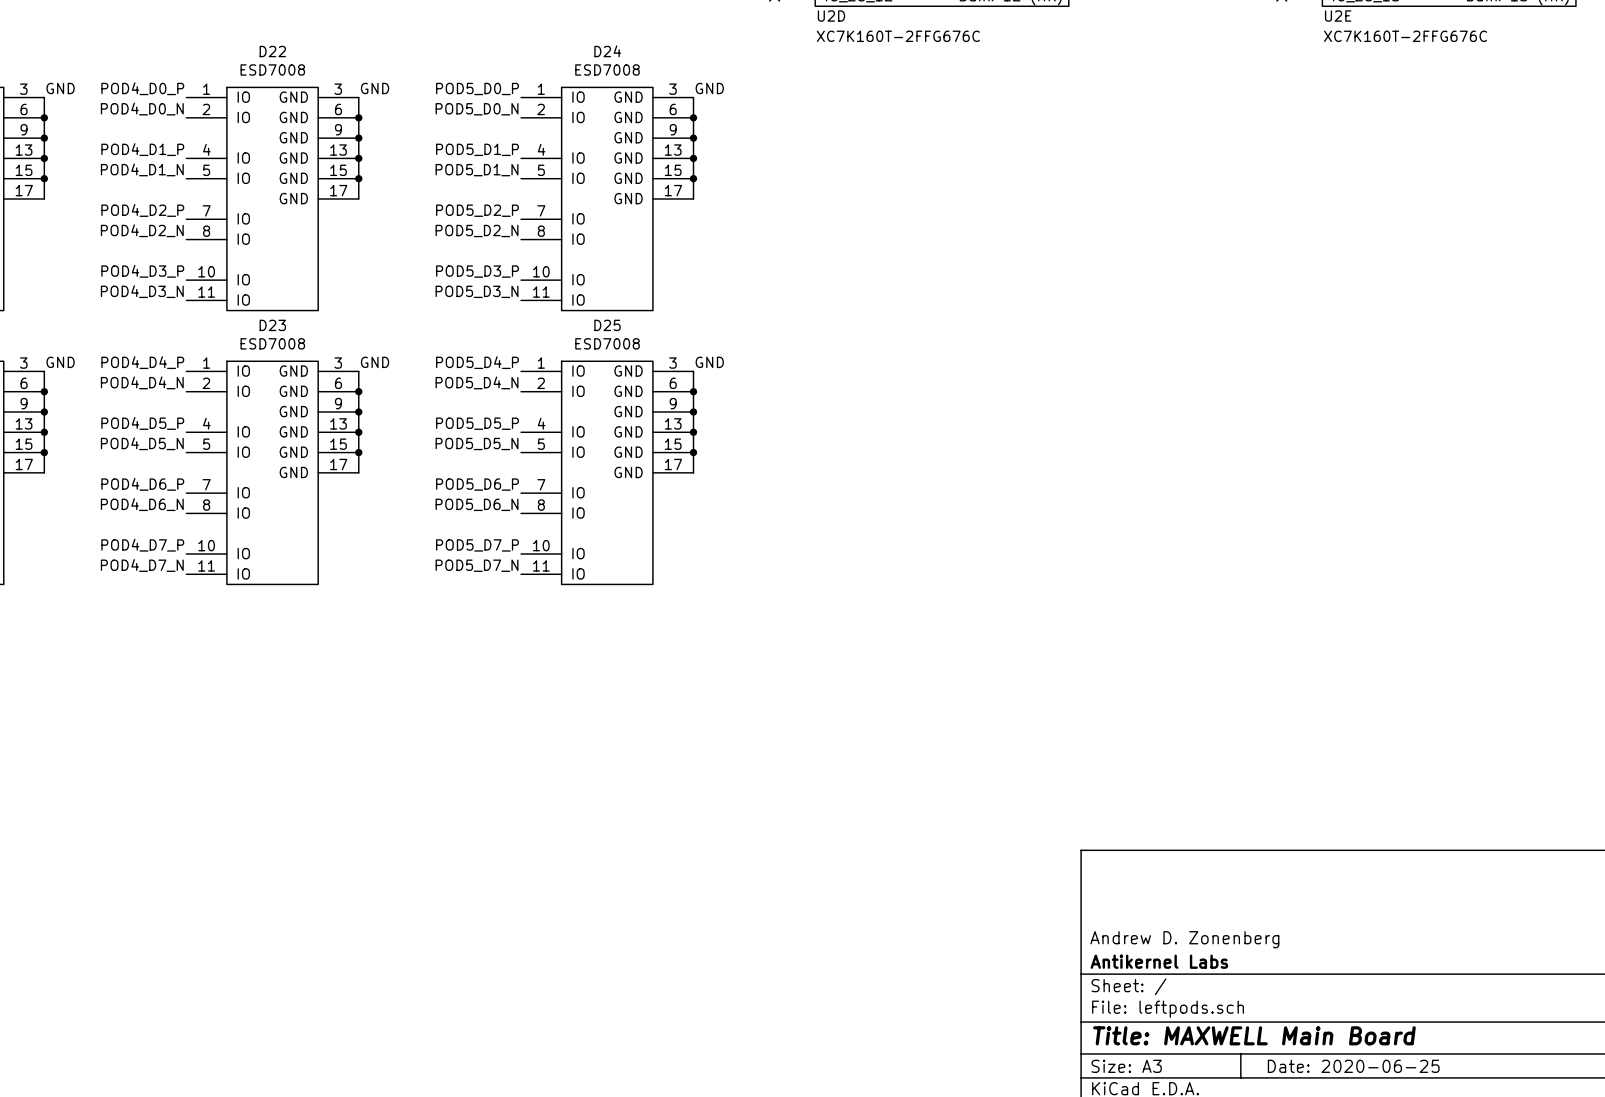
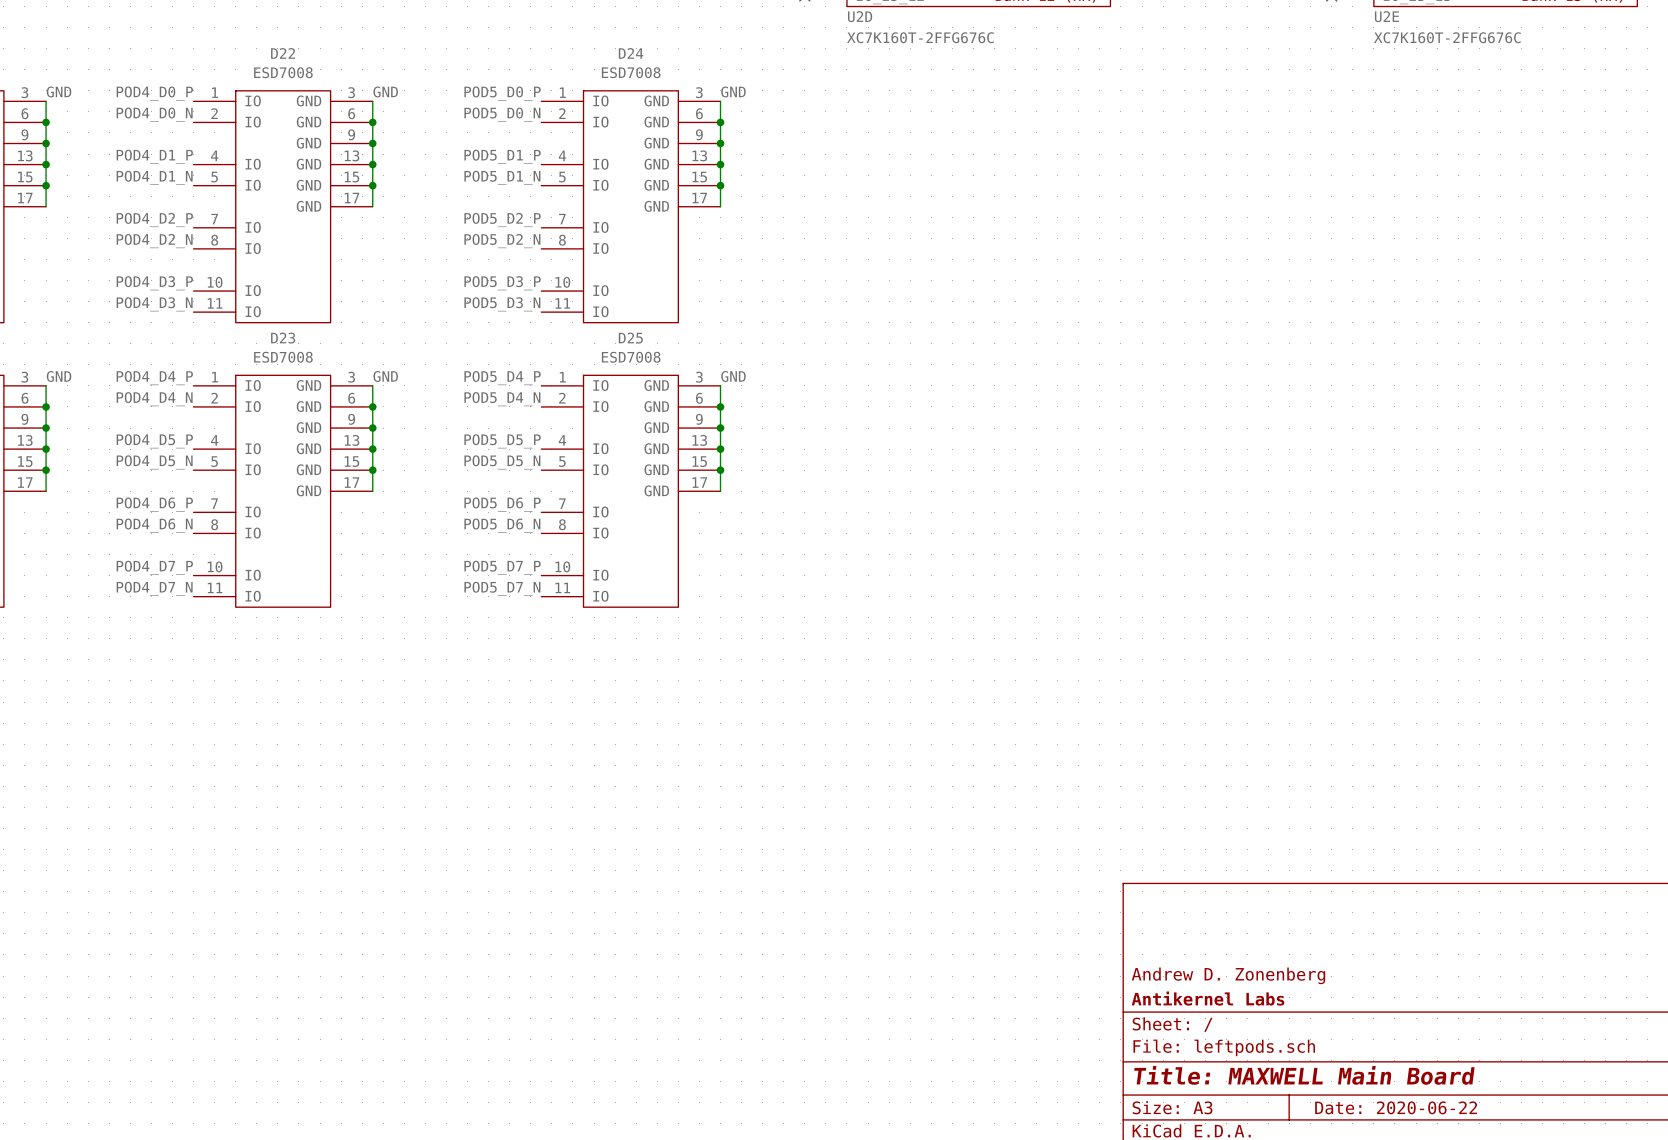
title block: Date: 2020-06-25 (1353, 1066) -> Date: 2020-06-22 (1396, 1107)

